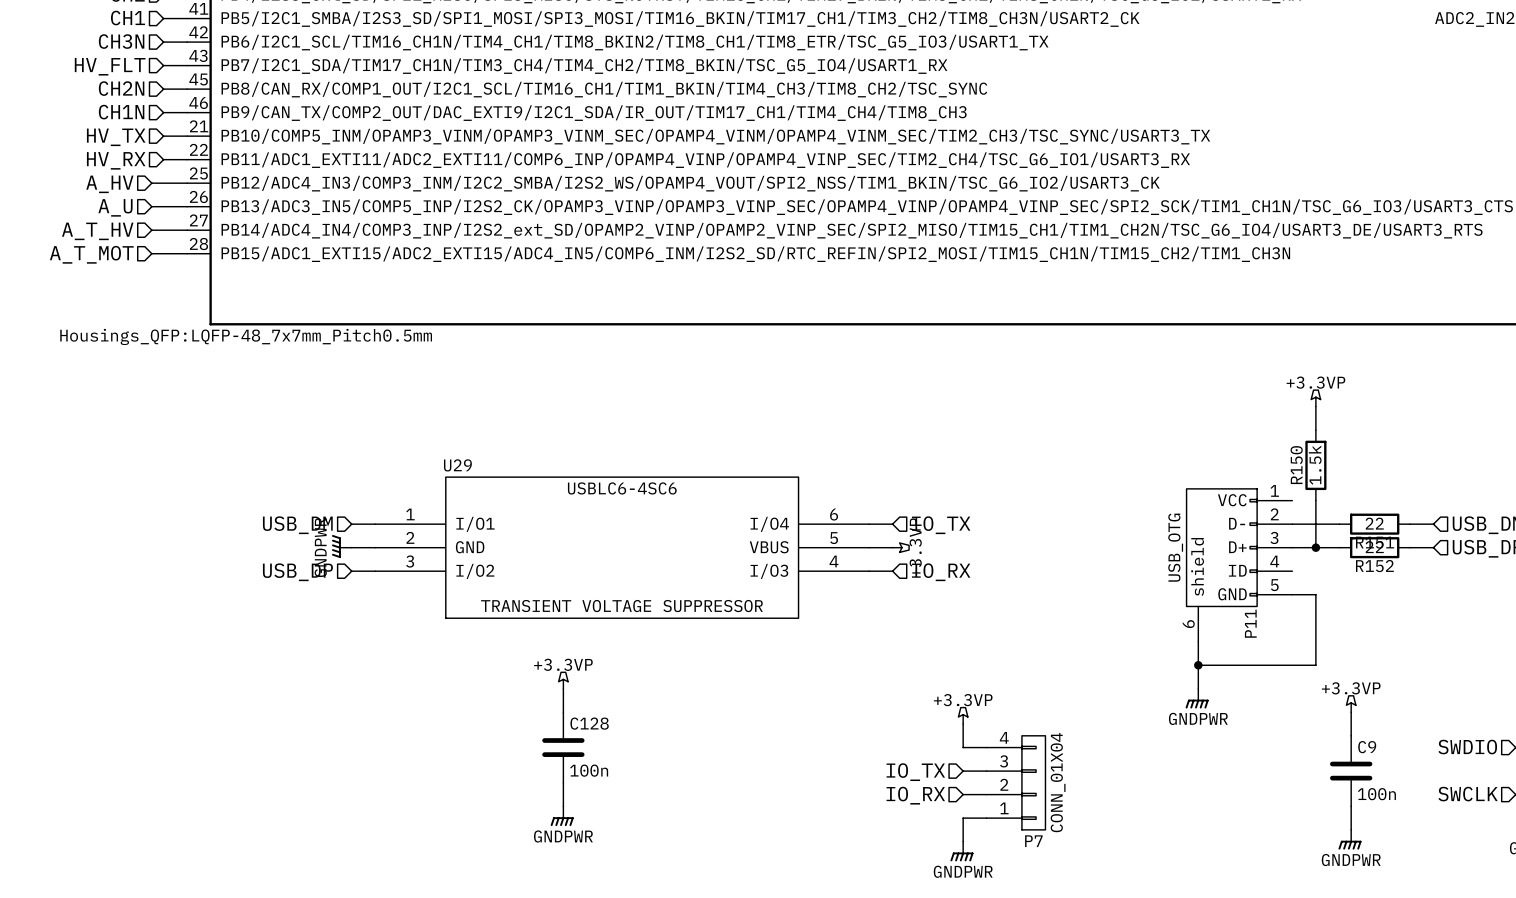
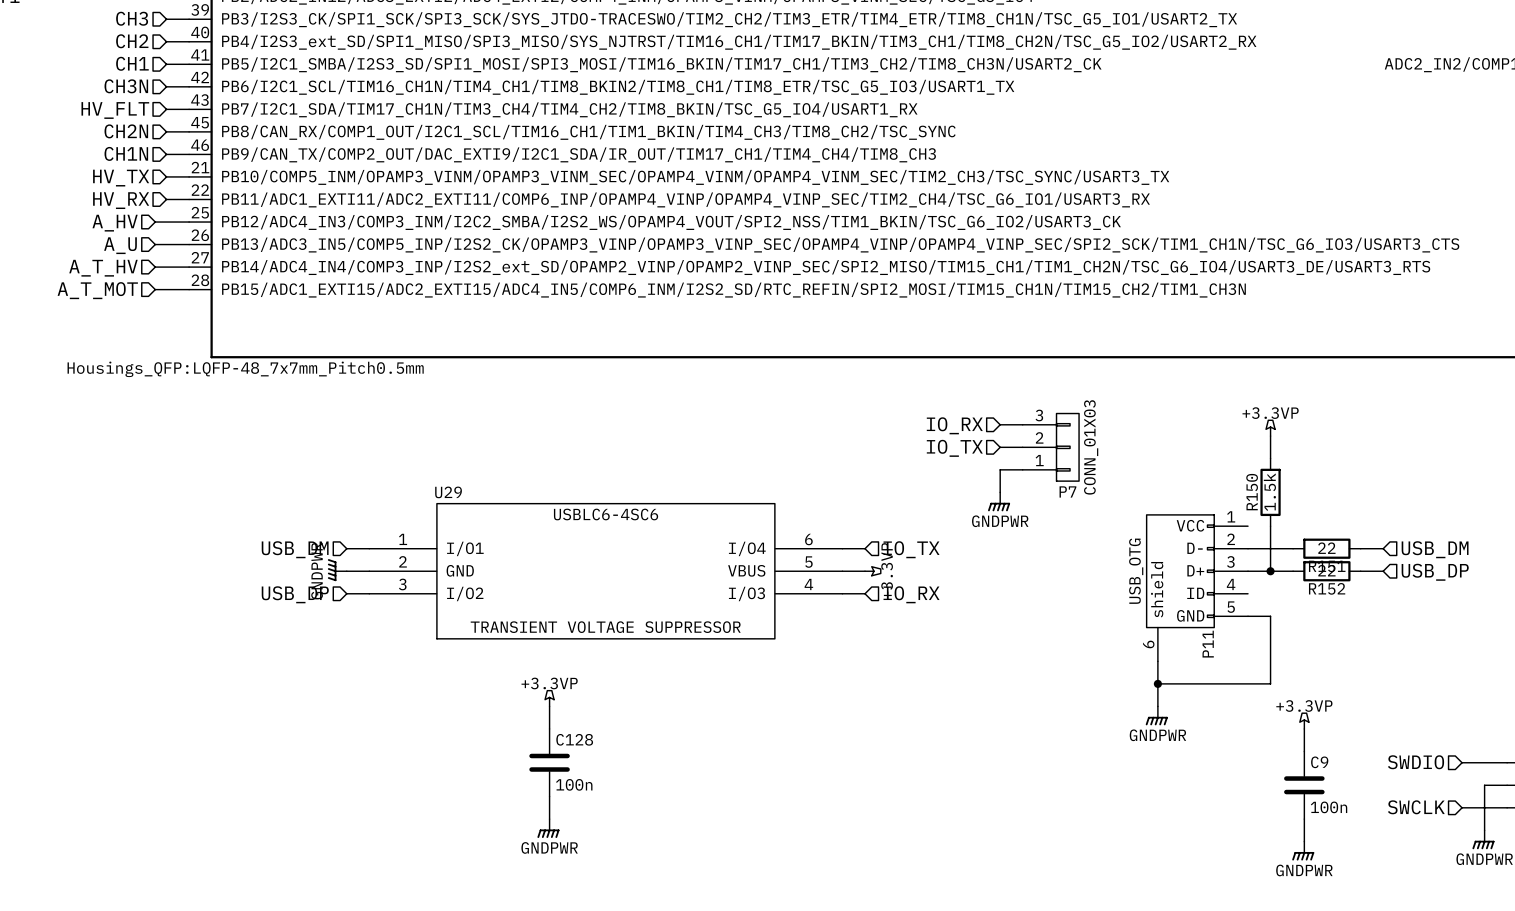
wire: none -> (1000, 424) (1022, 424)
hierarchical label: none -> IO_RX (954, 425)
wire: none -> (1000, 447) (1022, 447)
hierarchical label: none -> IO_TX (954, 448)
wire: none -> (1022, 469) (1000, 469) (1000, 492)
power symbol: none -> GNDPWR (999, 501)
power symbol: +3.3VP (963, 715) -> none
wire: (963, 724) (963, 747) (986, 747) -> none
P7 symbol: [986, 735, 1046, 830] -> [1022, 413, 1080, 482]
wire: (963, 771) (986, 771) -> none
hierarchical label: IO_TX (915, 772) -> none
P7 value: CONN_01X04 (1058, 782) -> CONN_01X03 (1091, 447)
wire: (963, 794) (986, 794) -> none
hierarchical label: IO_RX (915, 795) -> none
wire: (986, 818) (963, 818) (963, 841) -> none
power symbol: GNDPWR (961, 851) -> none

